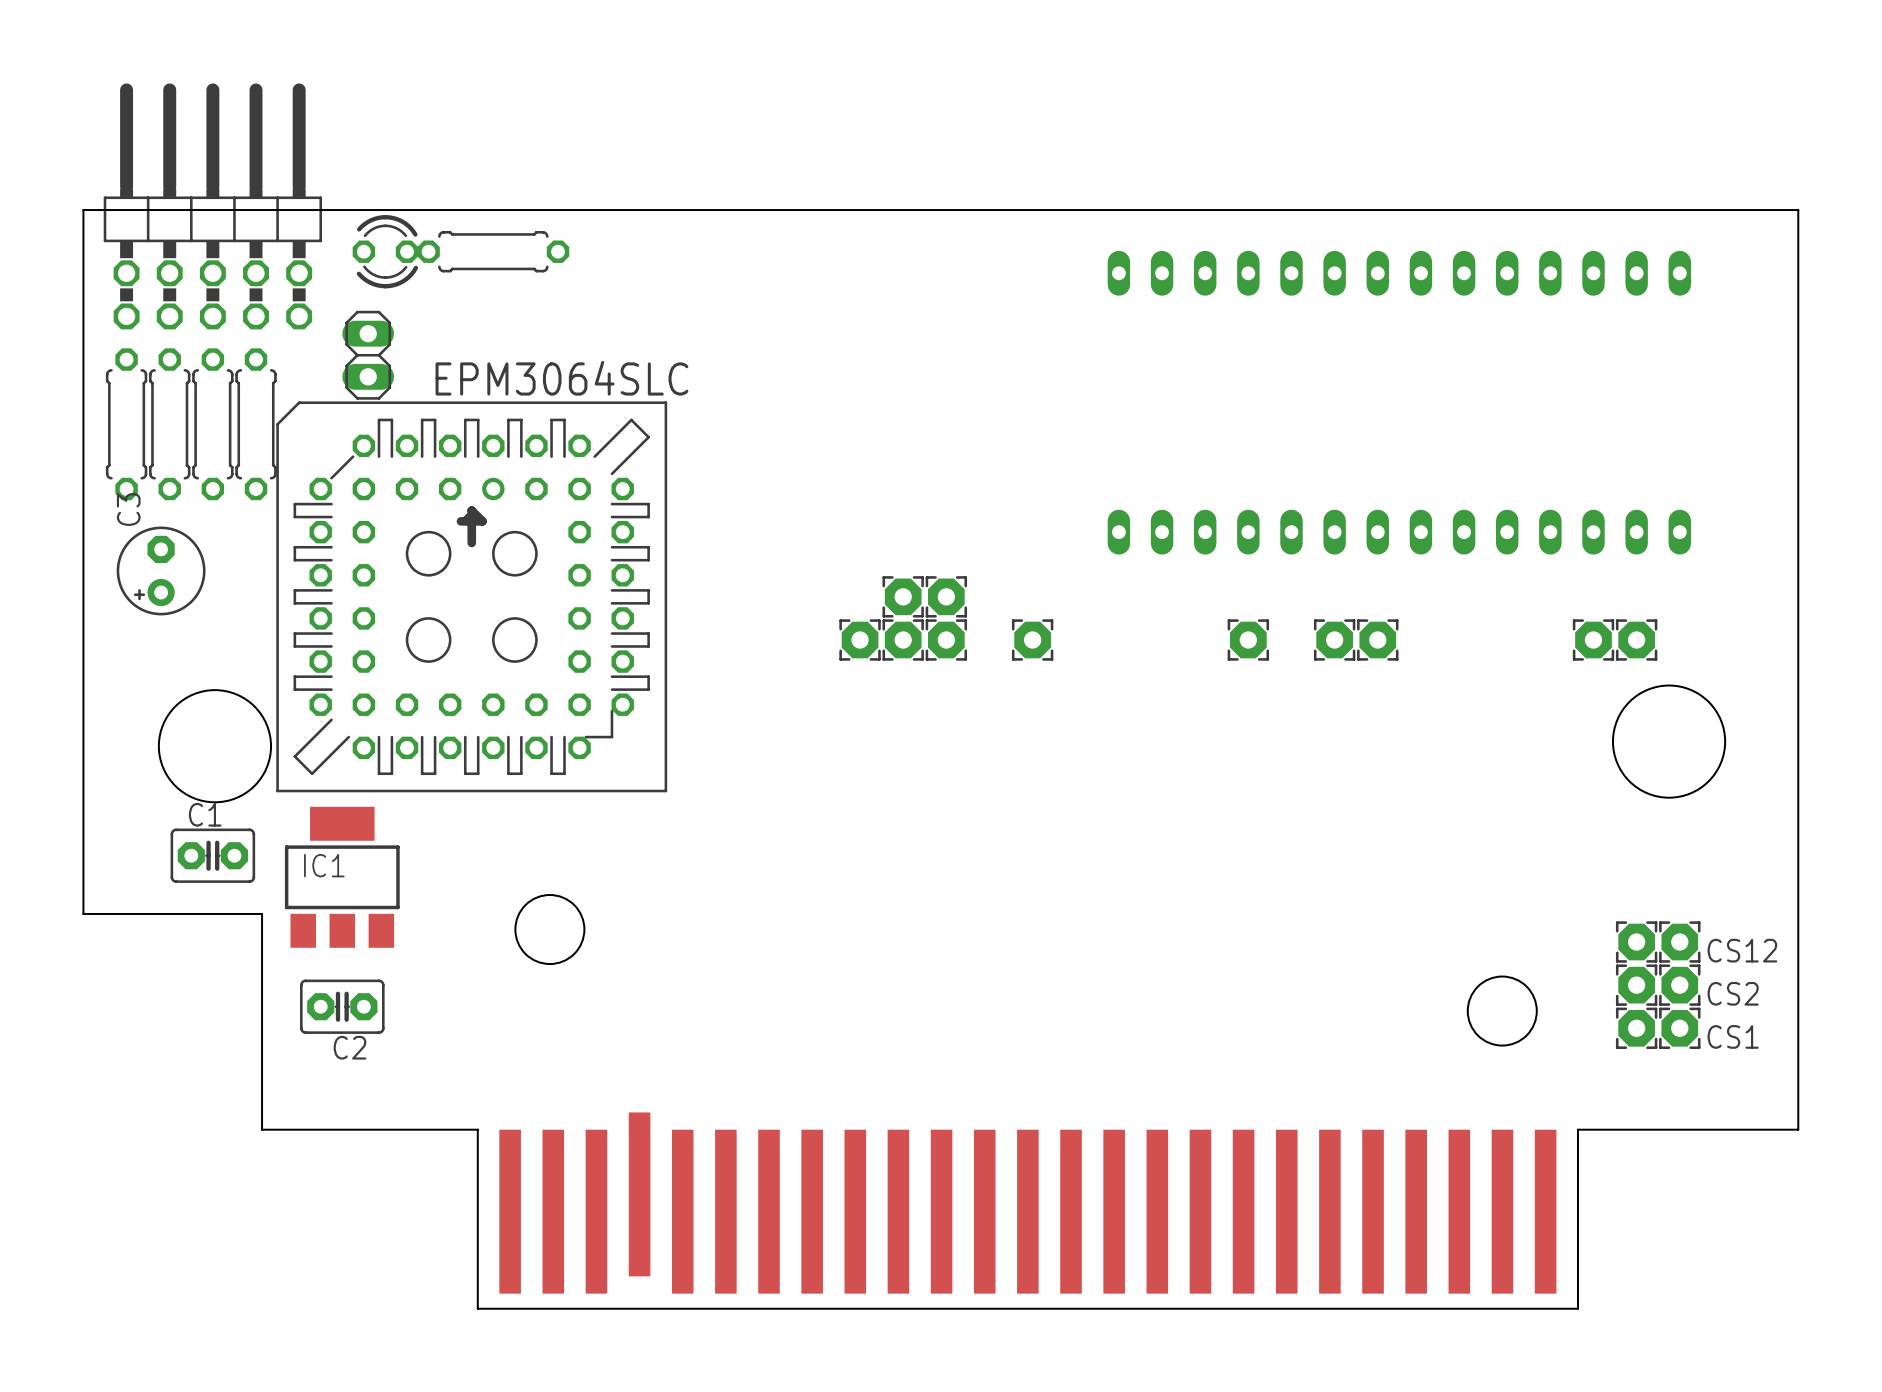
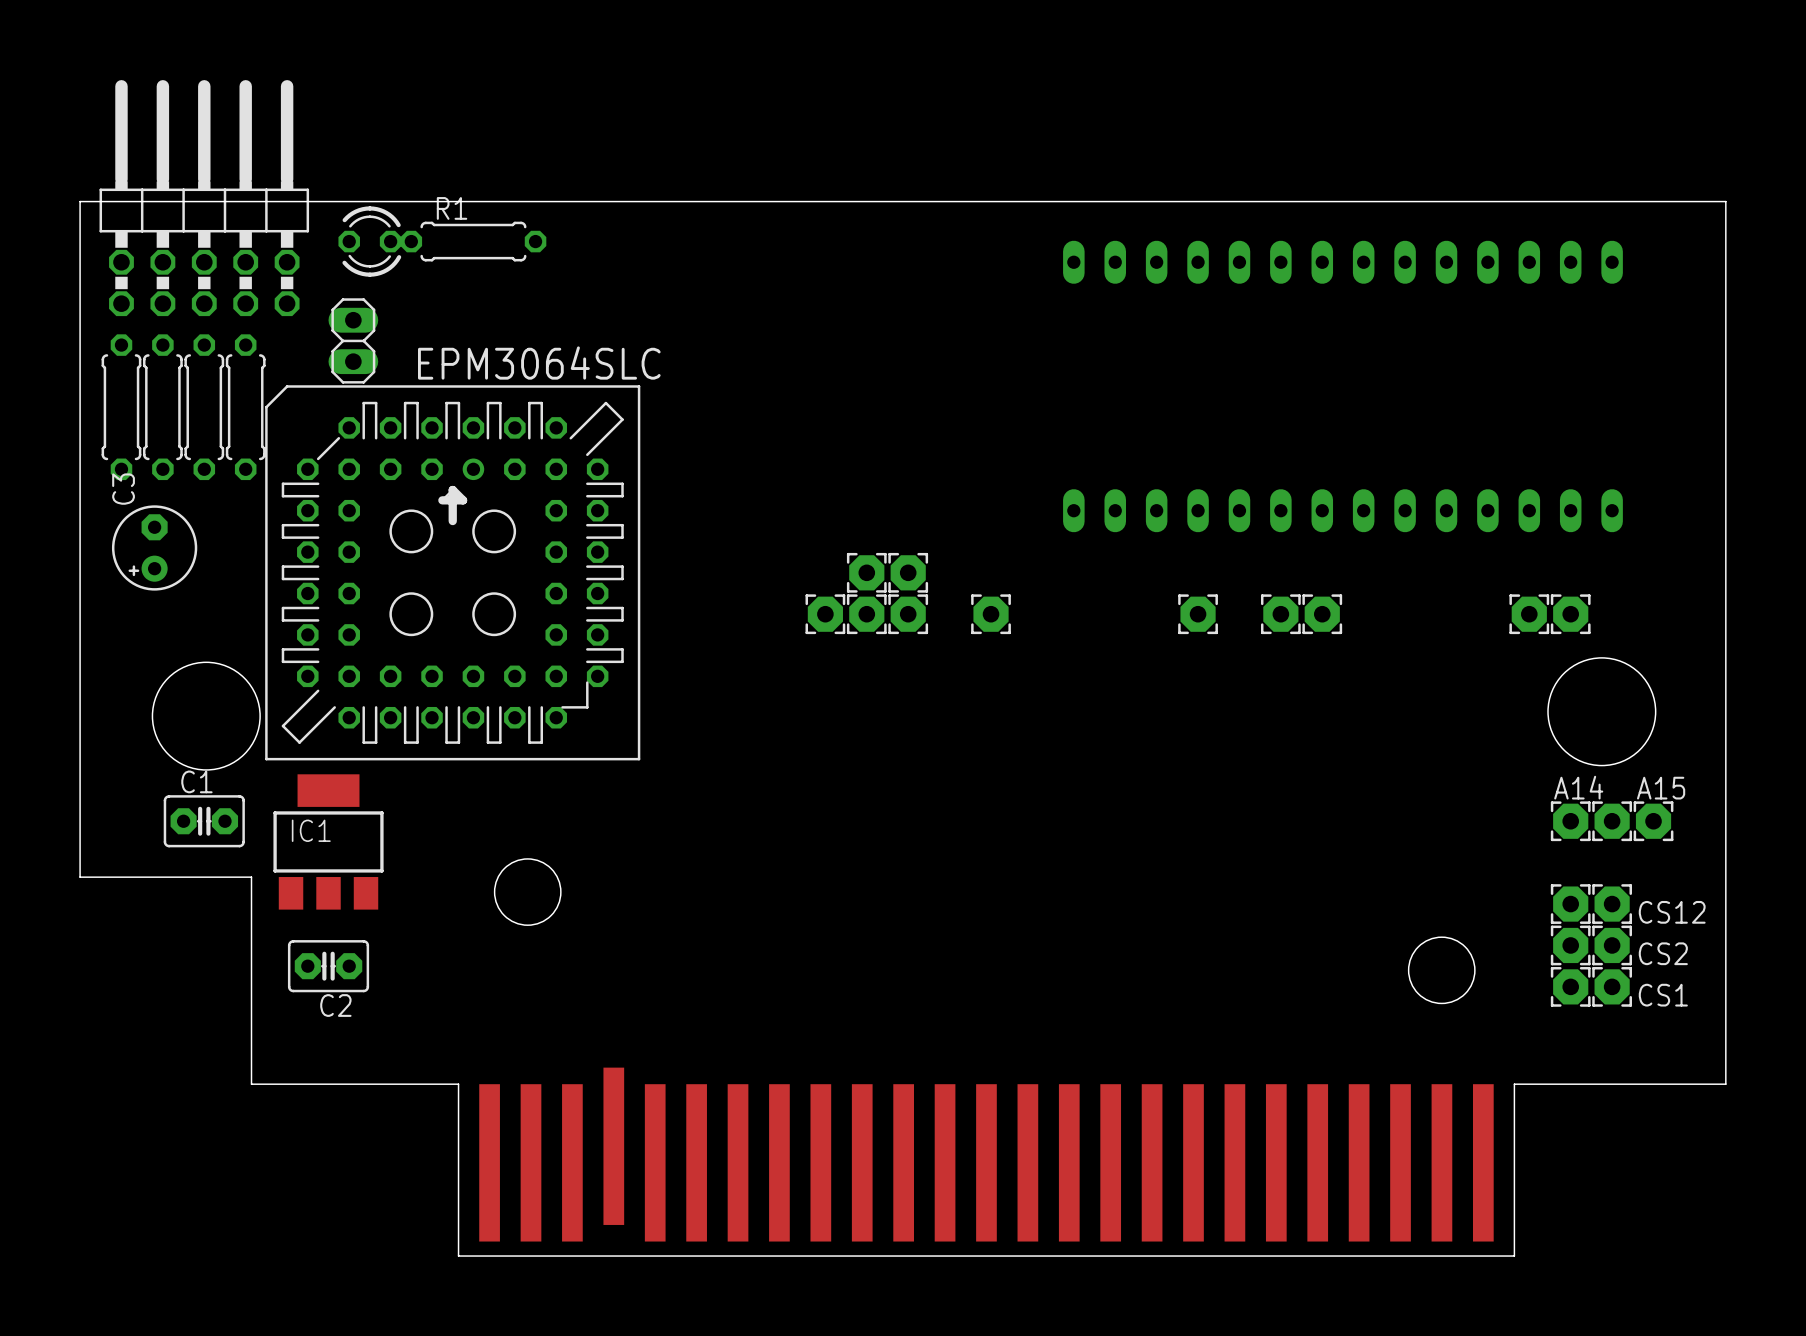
R1 name: none -> R1 (452, 208)
A14: none -> (1570, 821)
part: none -> (1612, 821)
A15: none -> (1653, 821)

